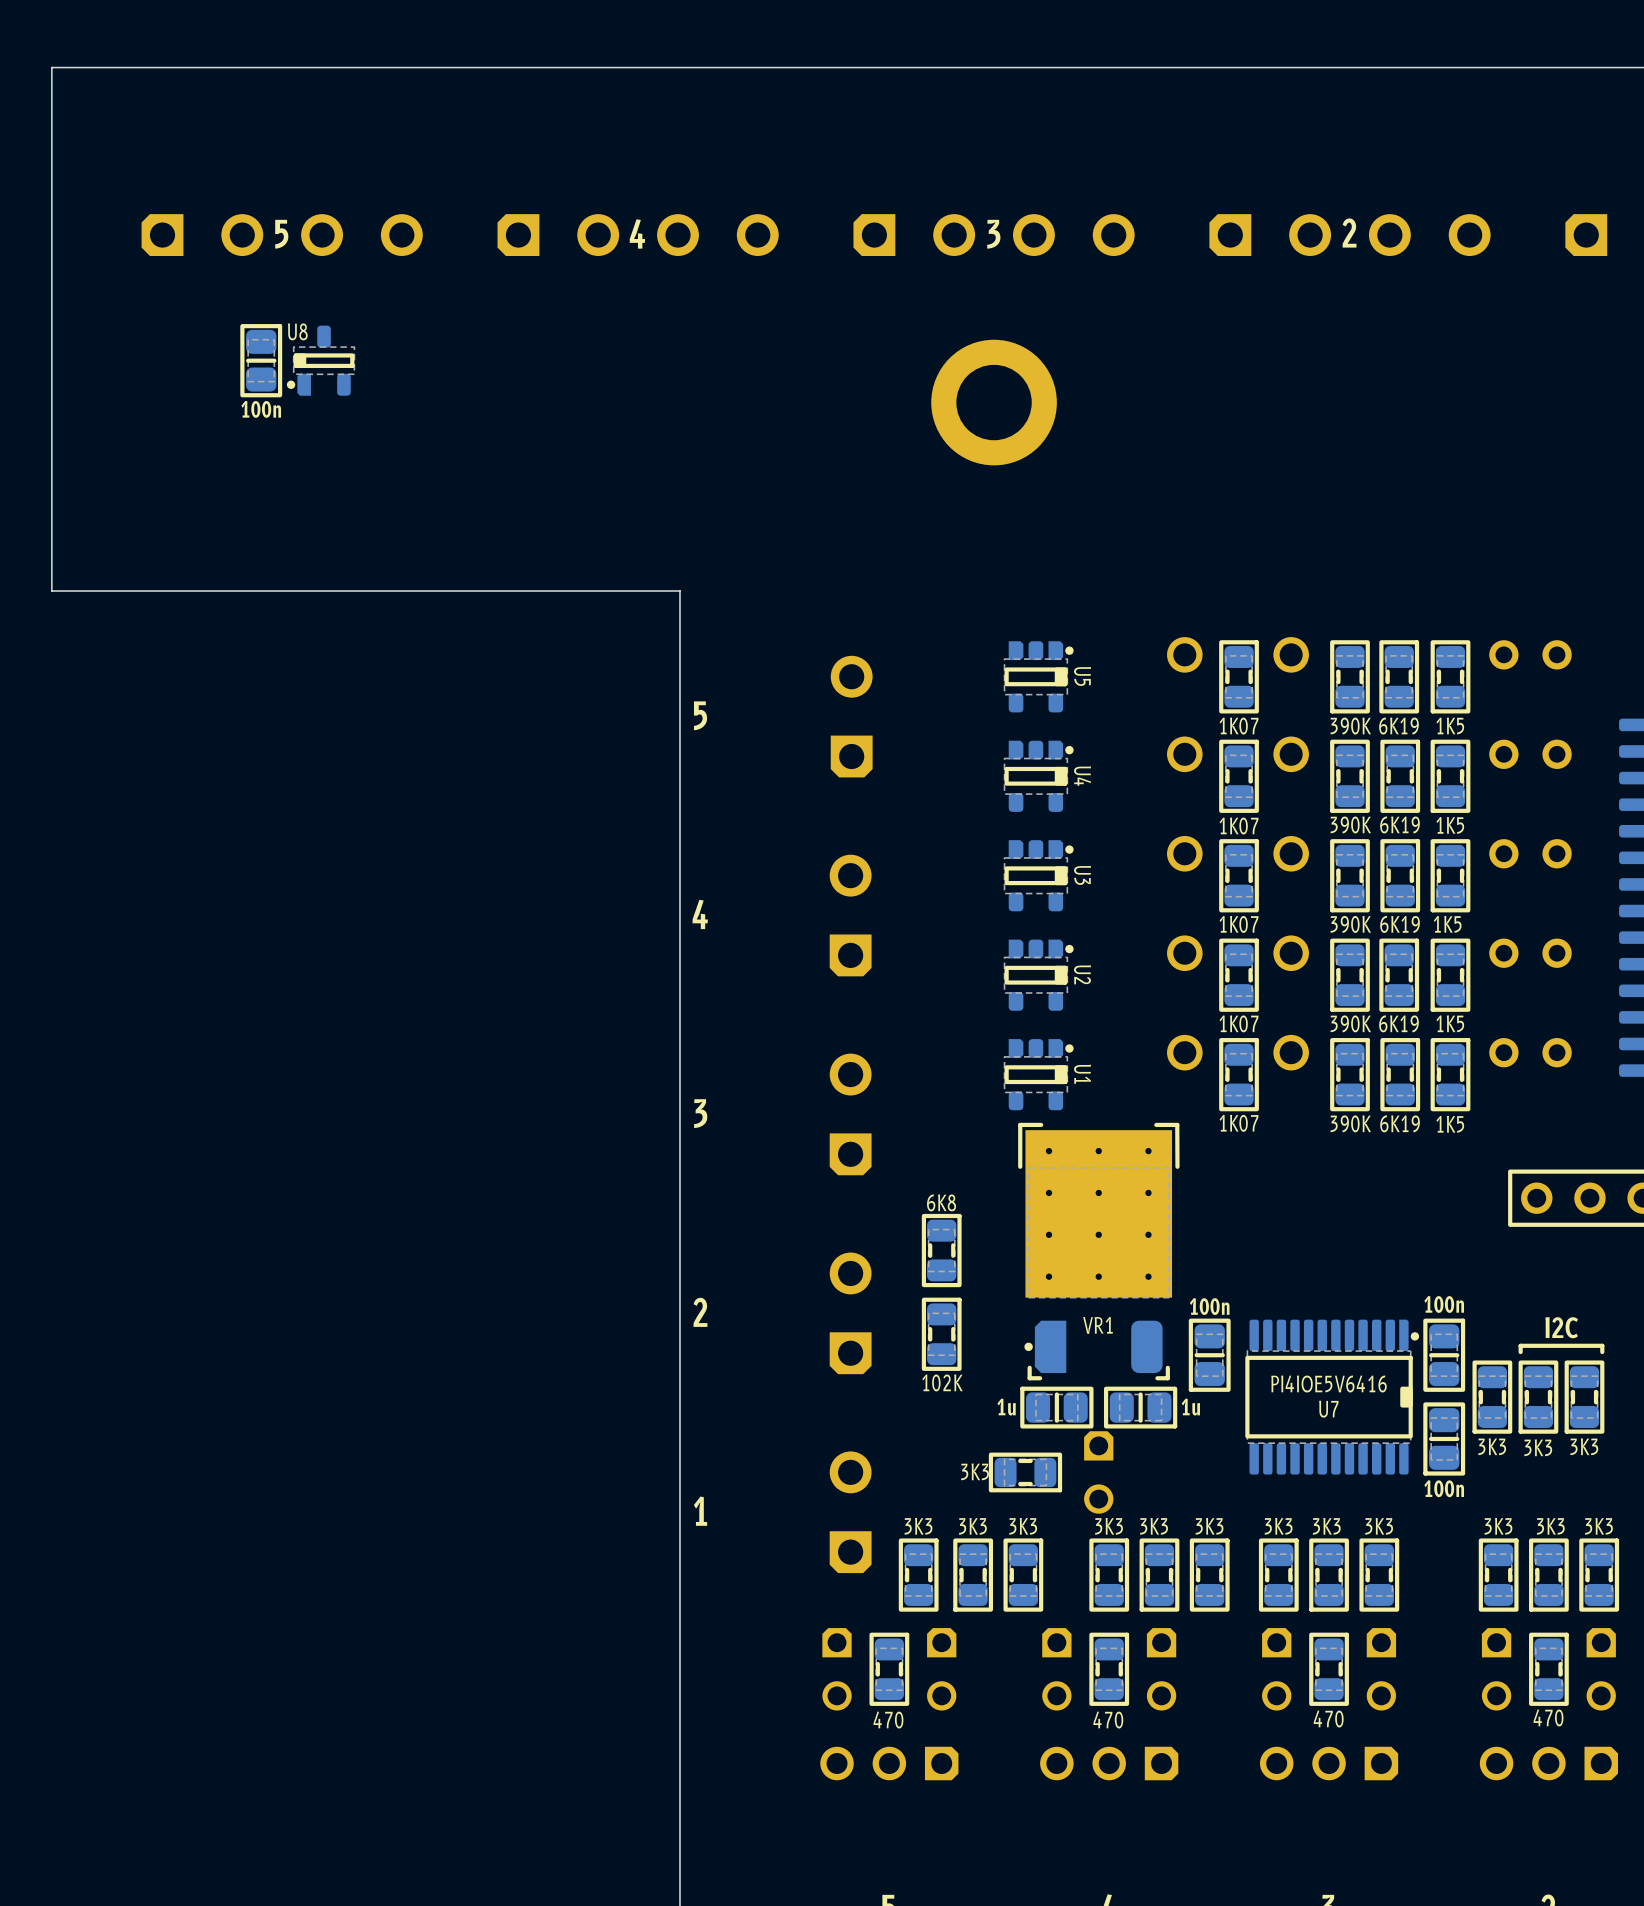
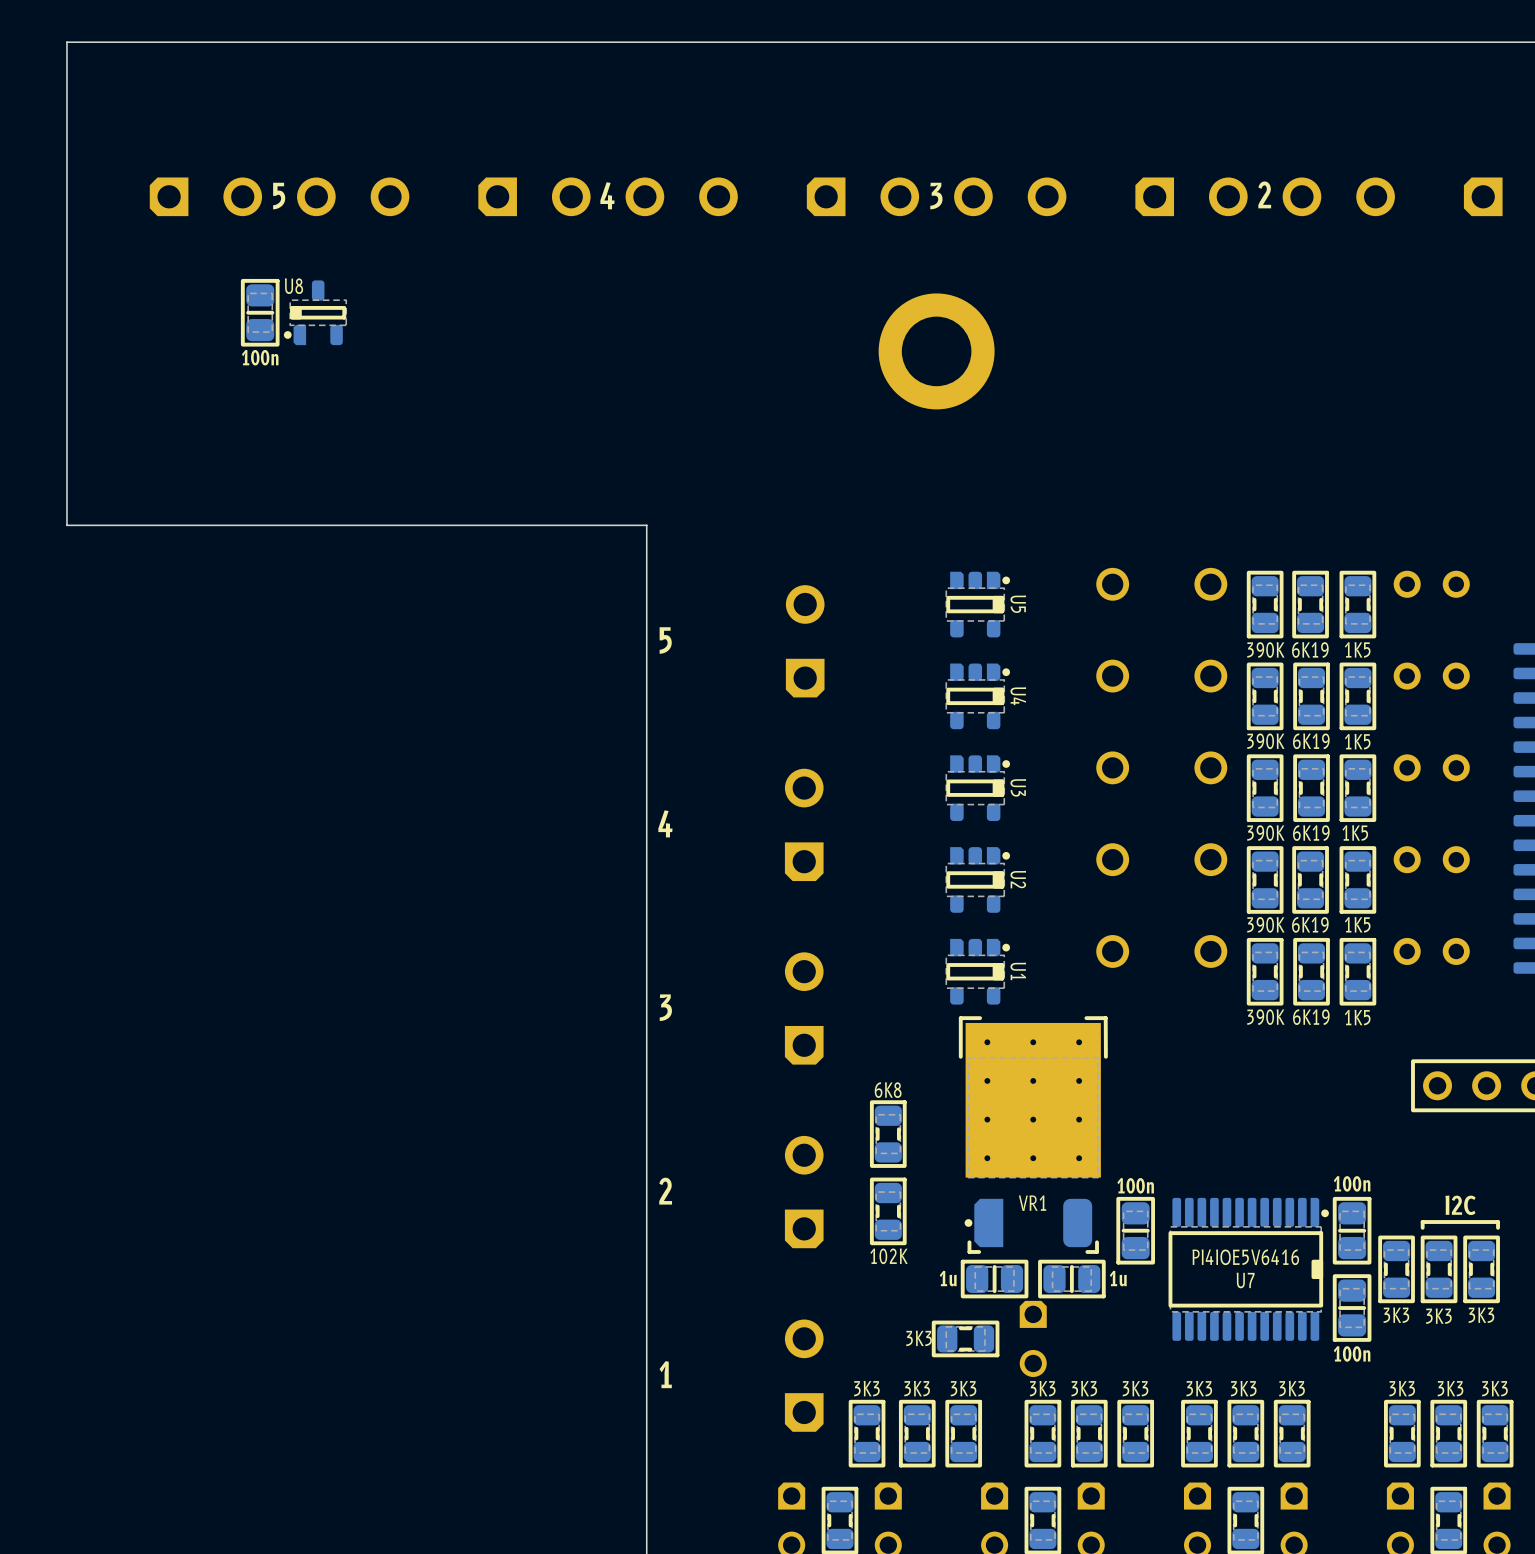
part: 1K07 (1239, 676) -> none
part: 1K07 (1239, 776) -> none
part: 1K07 (1239, 875) -> none
part: 1K07 (1239, 975) -> none
part: 1K07 (1239, 1074) -> none

